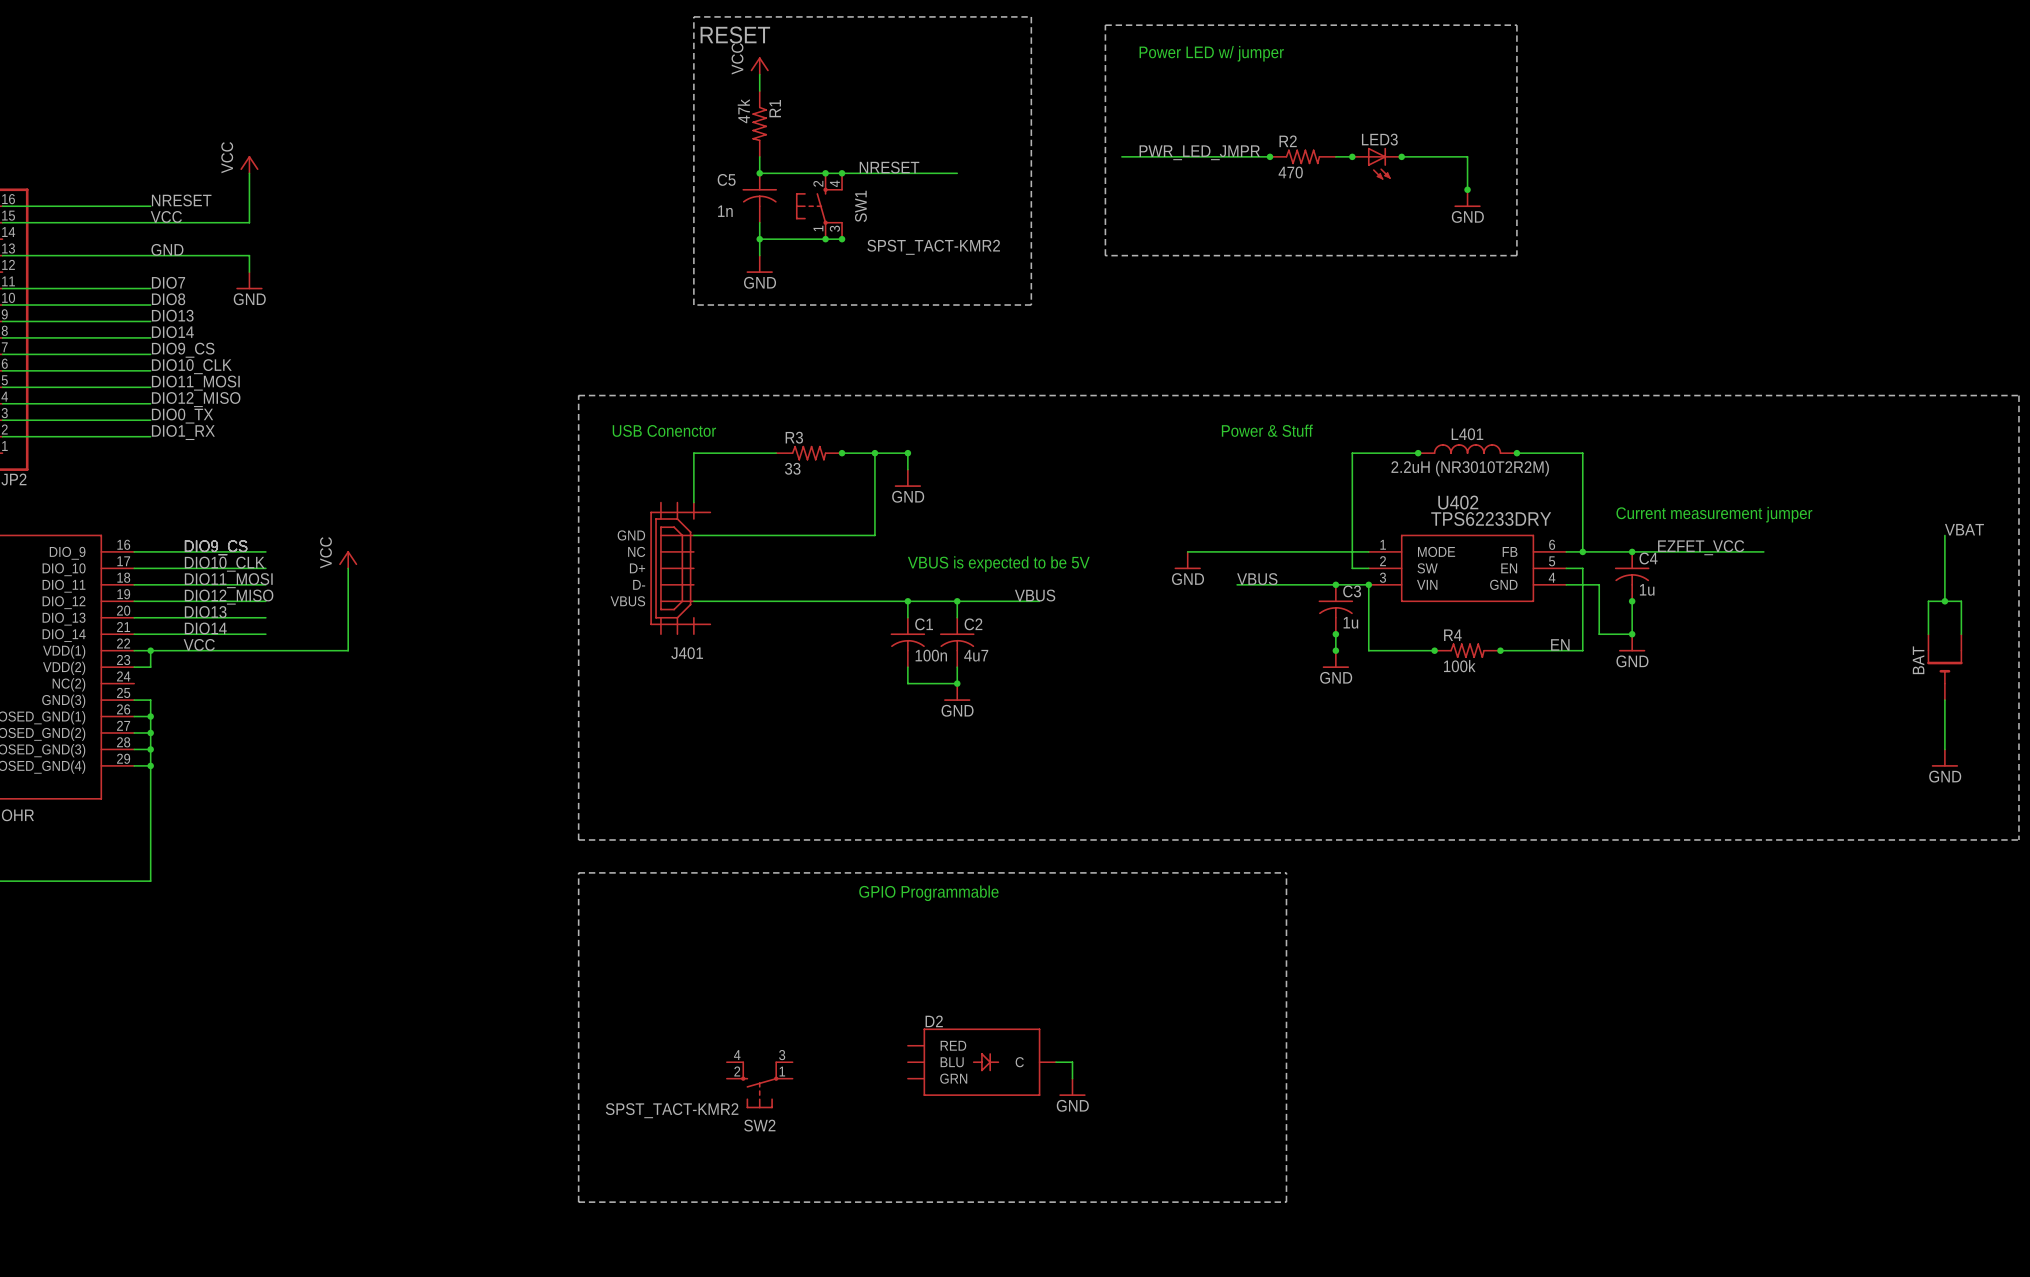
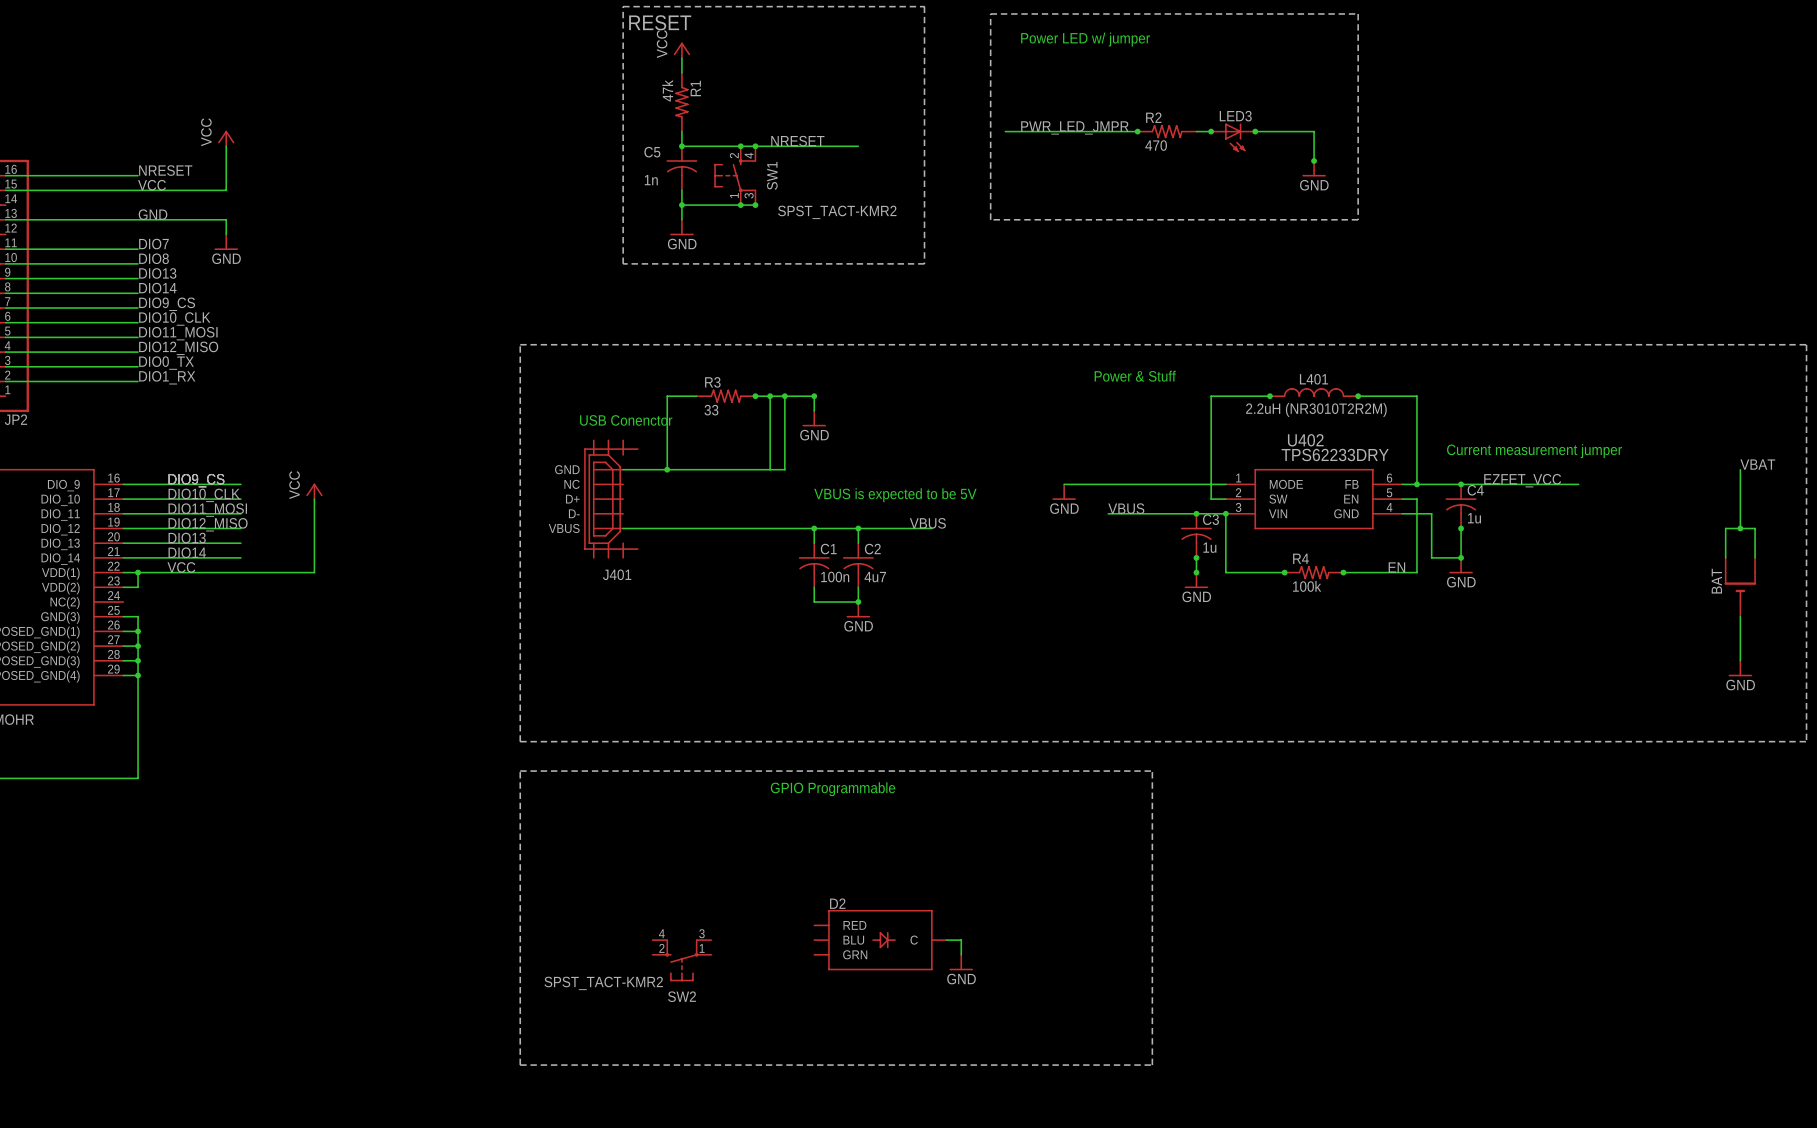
text position: USB Conenctor (664, 430) -> USB Conenctor (626, 420)
wire: (743, 453) (693, 453) (693, 502) -> (667, 396) (667, 469)
wire: none -> (770, 396) (770, 469)
junction: none -> (770, 396)
junction: none -> (667, 469)

